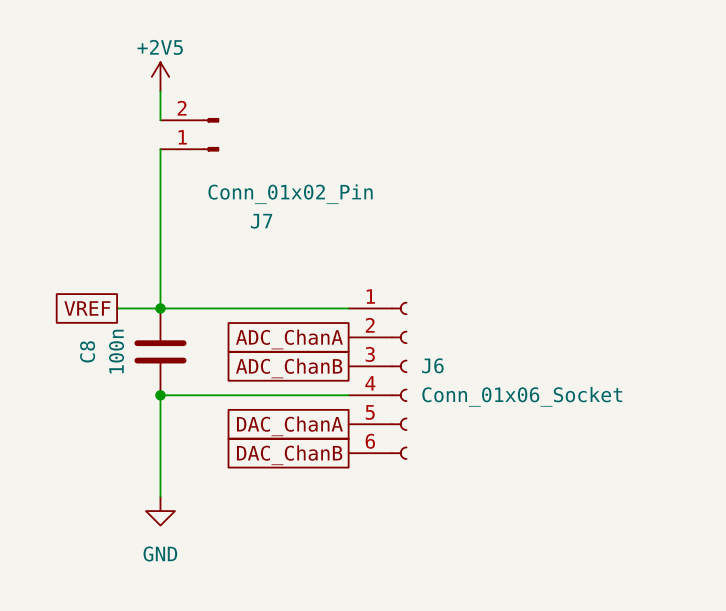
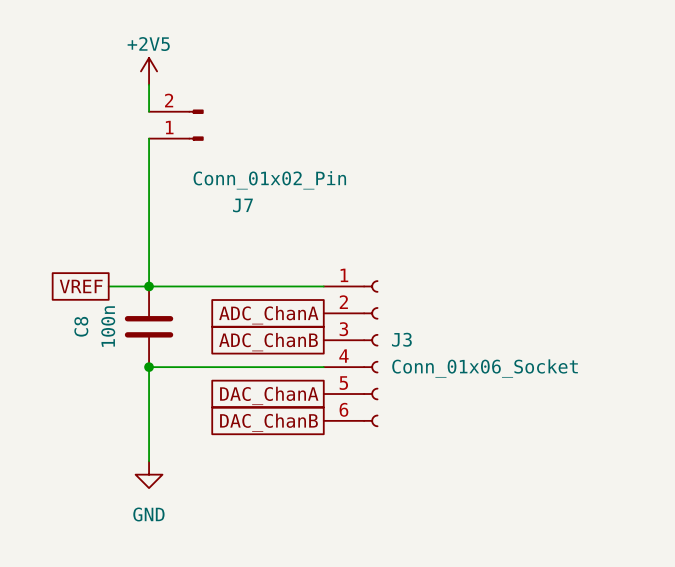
J6 name: J6 (432, 365) -> J3 (401, 339)

